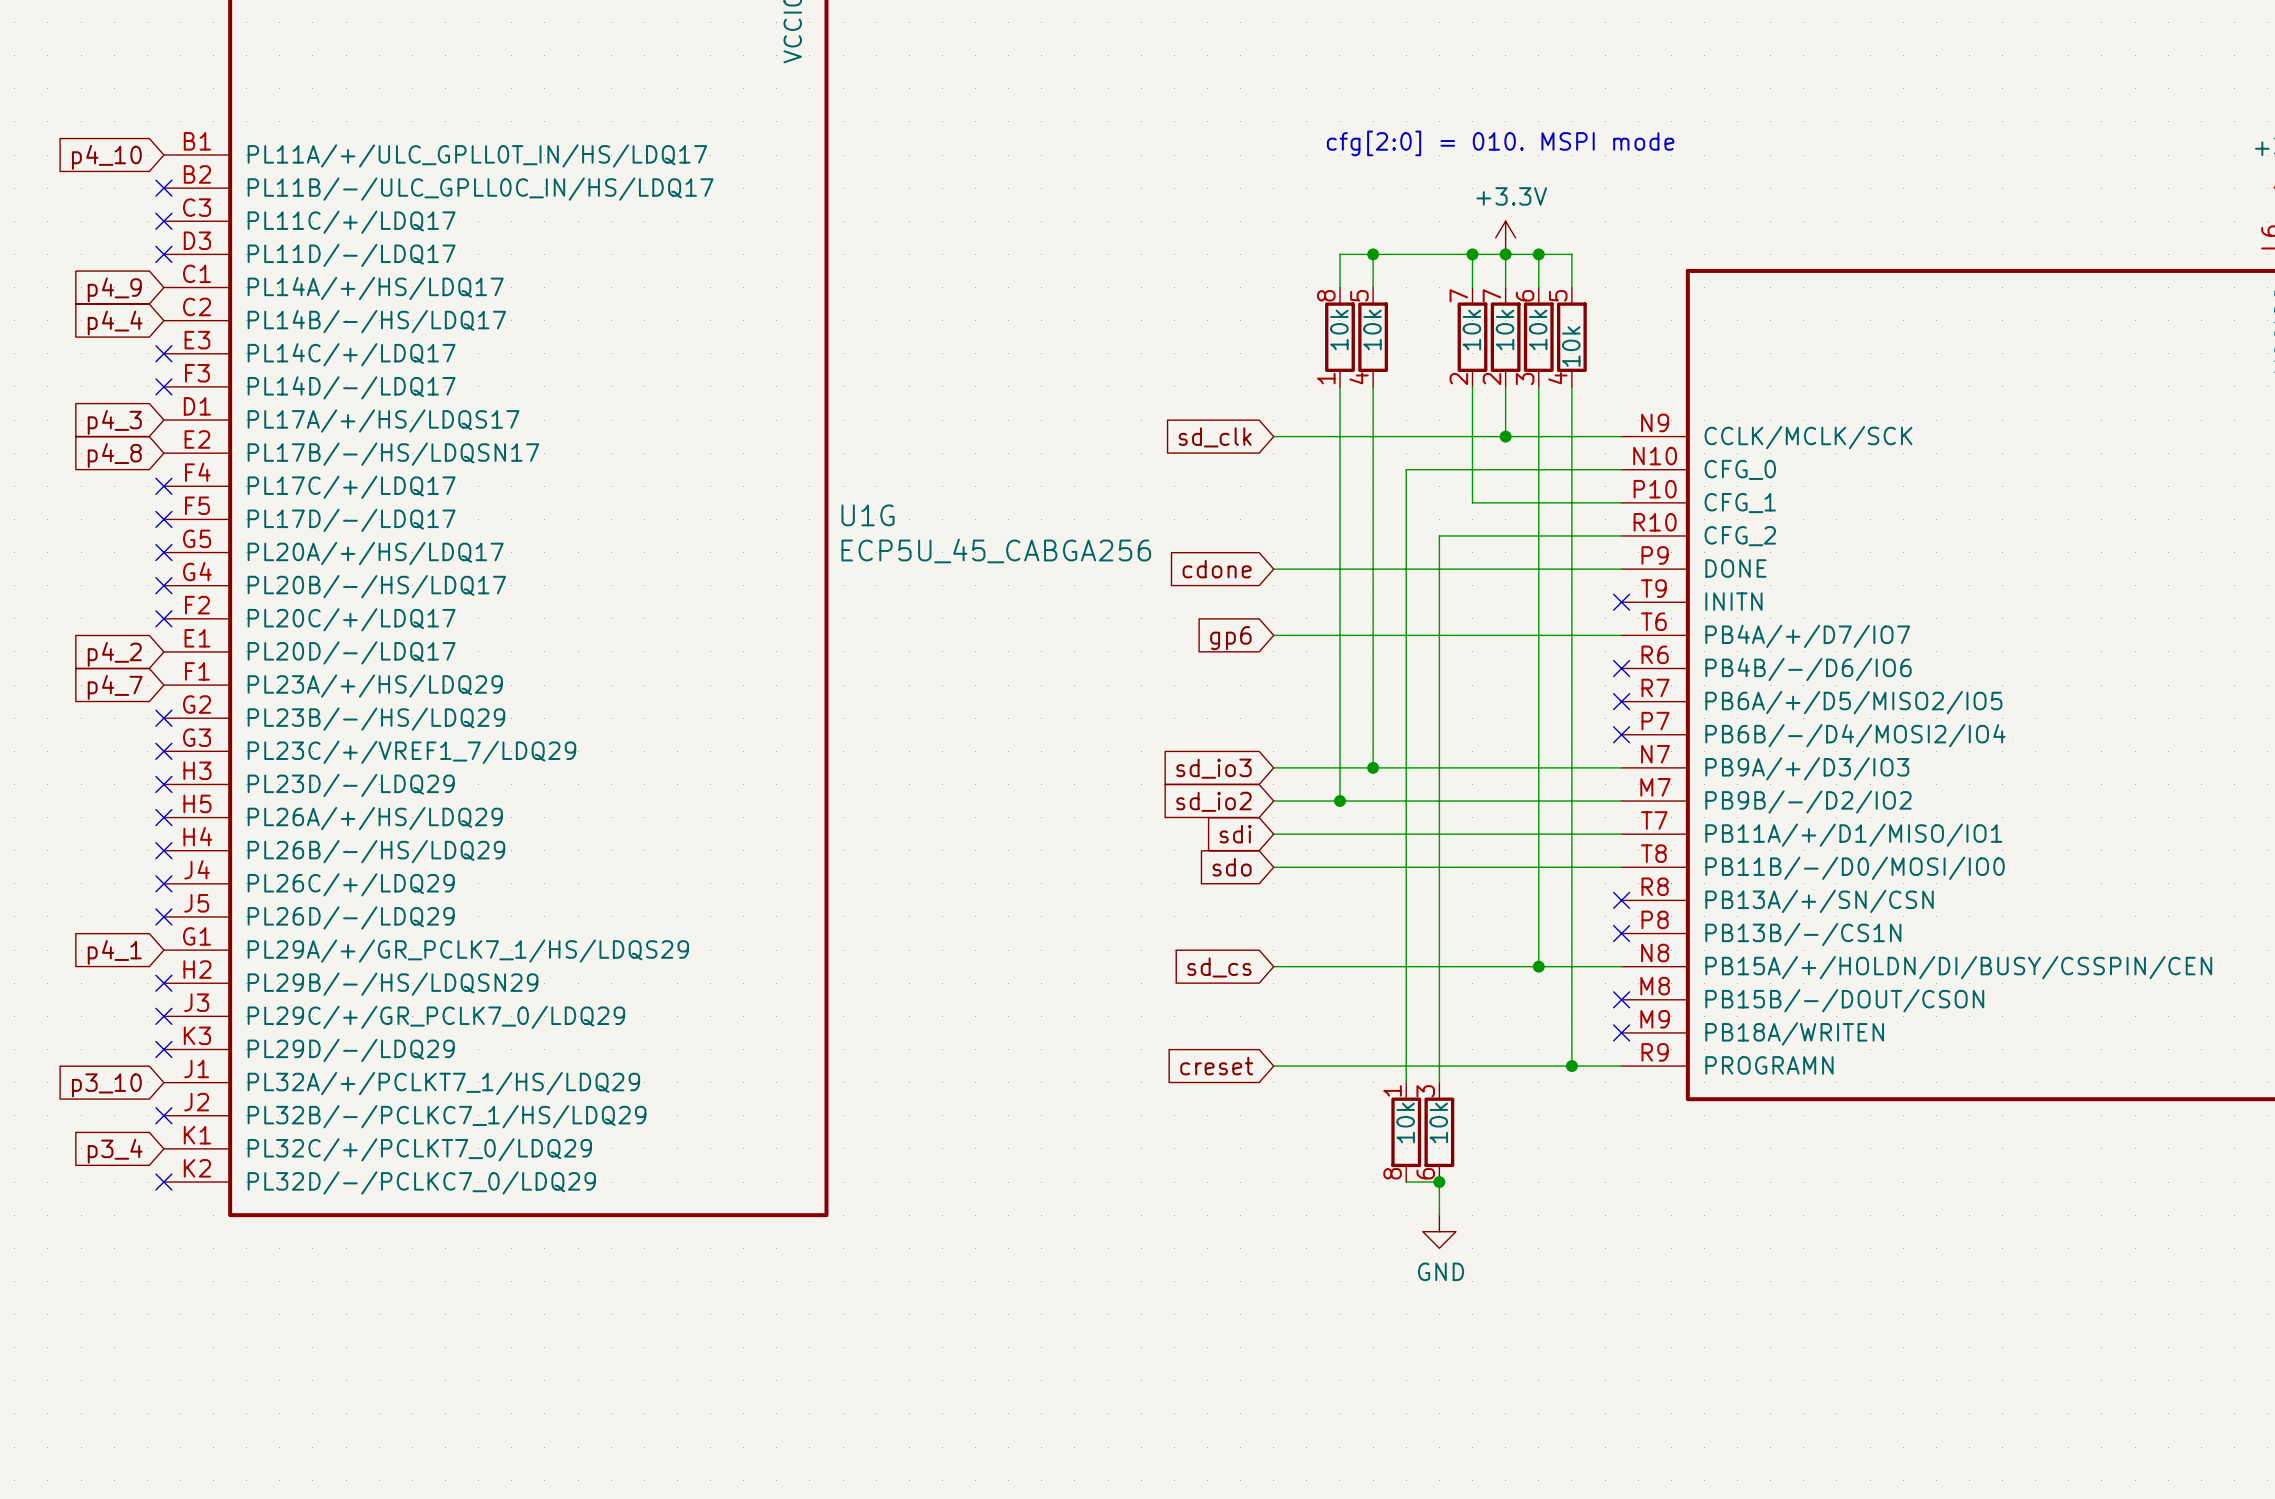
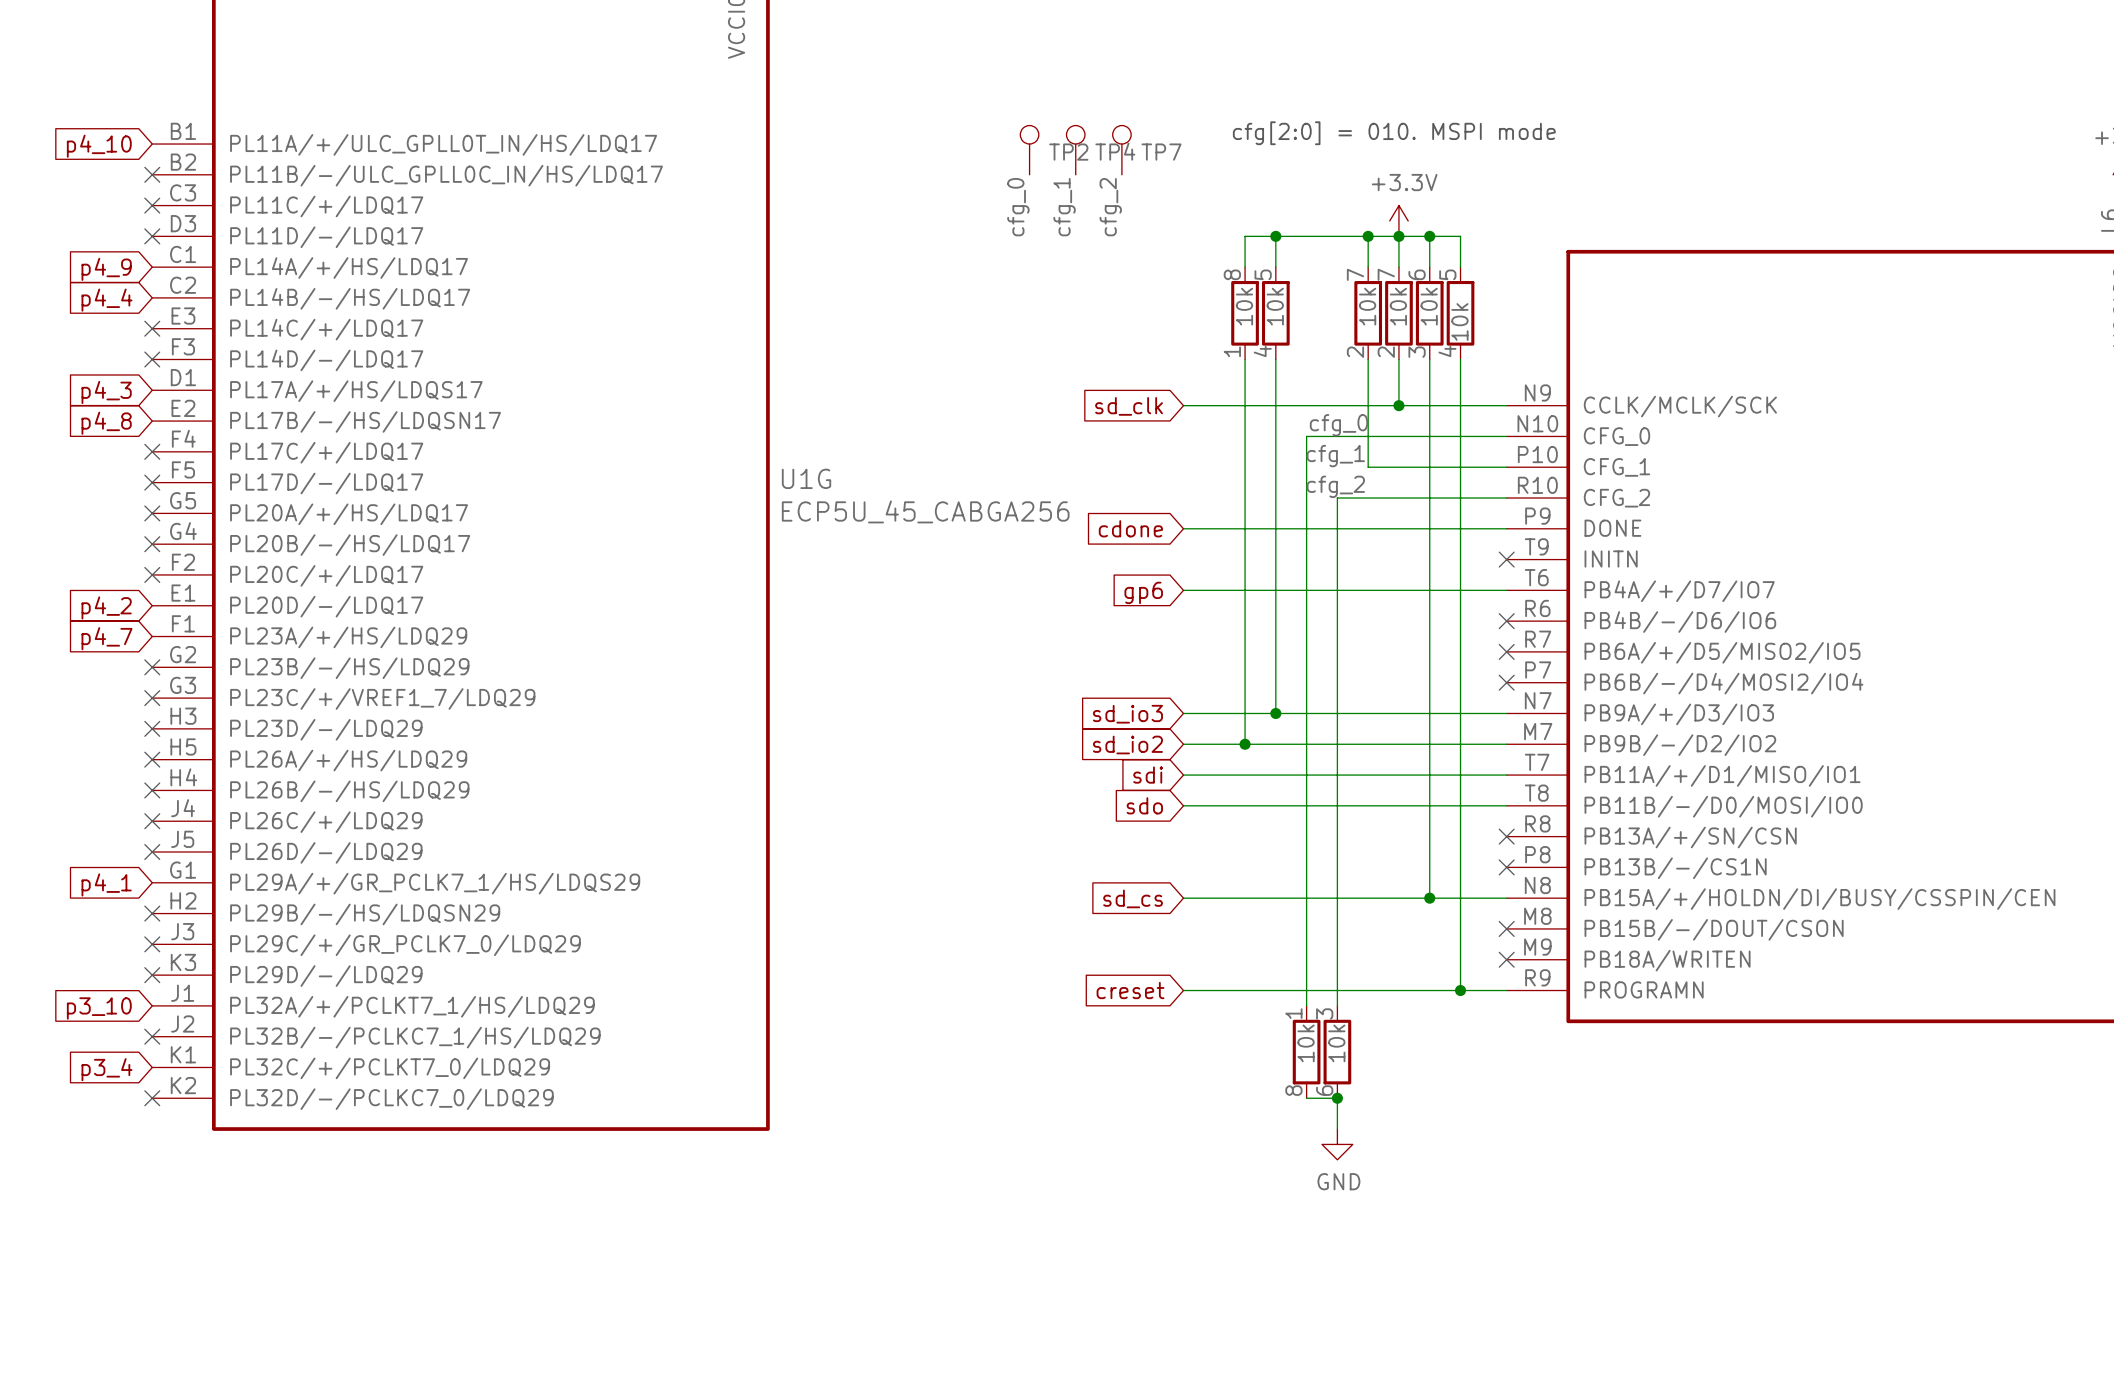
TP2: none -> (1029, 150)
TP4: none -> (1075, 150)
TP7: none -> (1121, 150)
label: none -> cfg_0 (1018, 207)
label: none -> cfg_1 (1064, 207)
label: none -> cfg_2 (1110, 207)
label: none -> cfg_0 (1338, 425)
label: none -> cfg_1 (1335, 456)
label: none -> cfg_2 (1335, 486)

